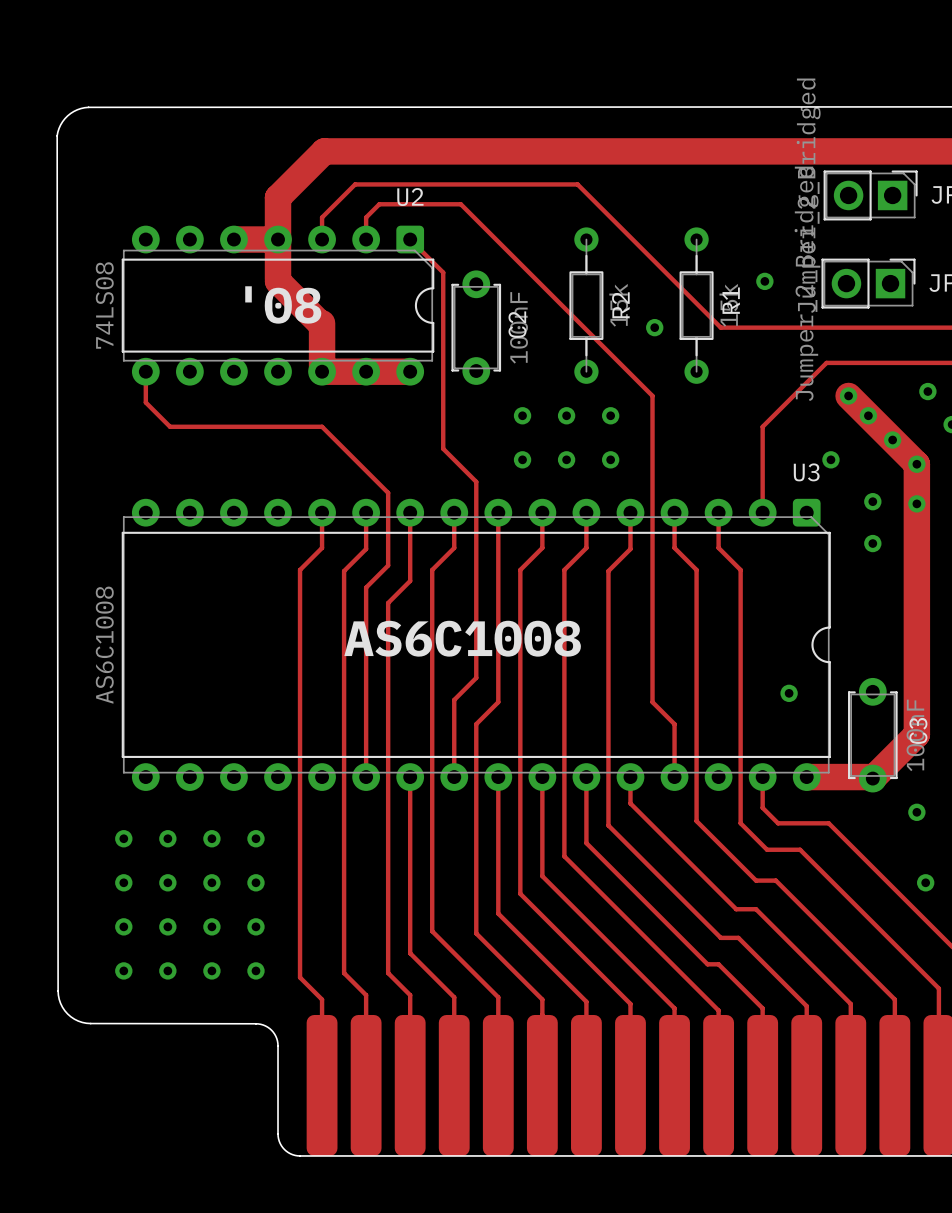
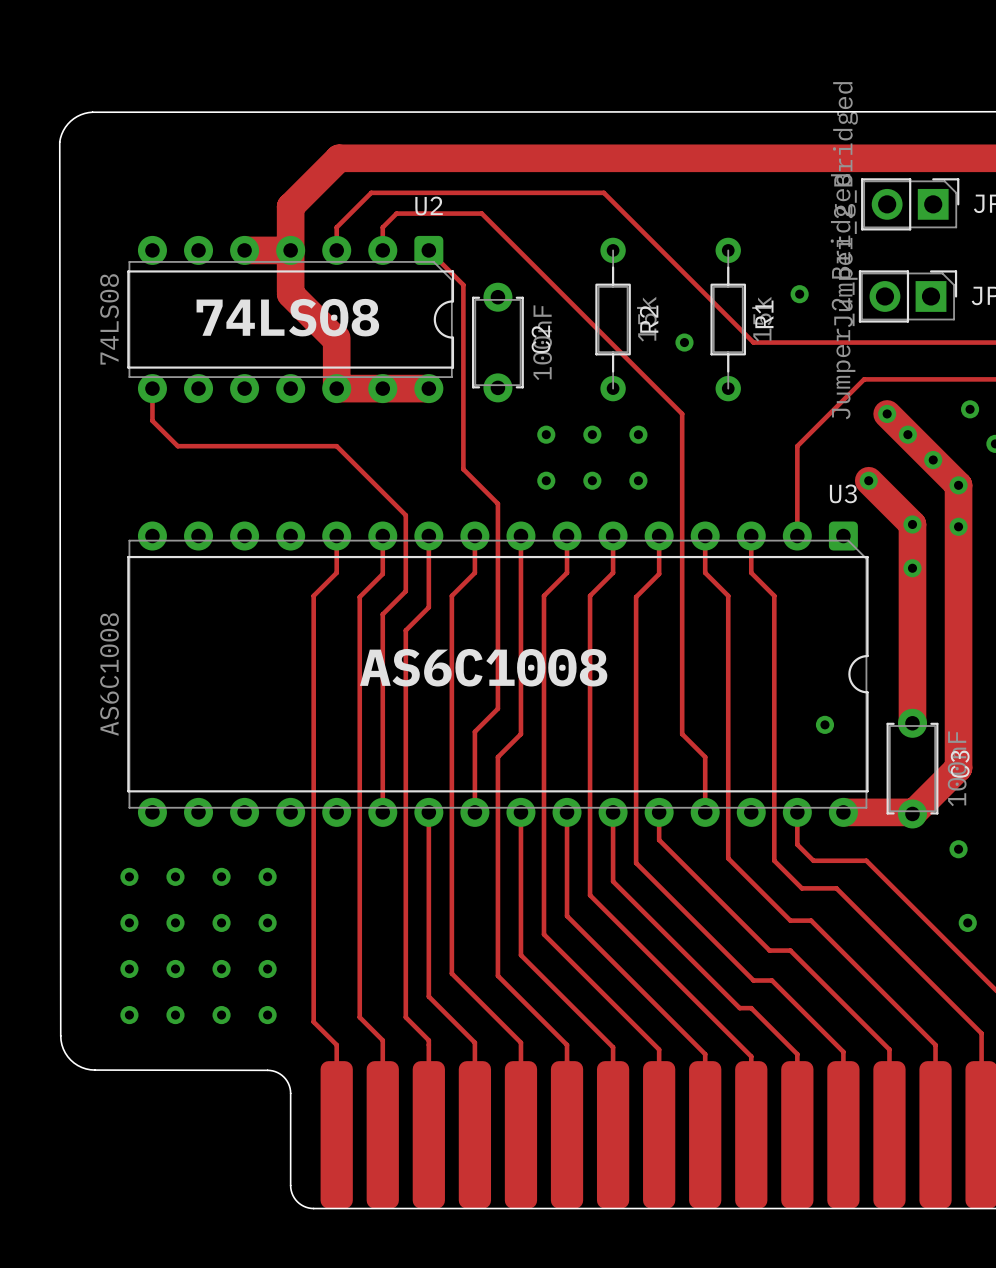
text: none -> 74LS08 (287, 317)
text: '08 (283, 304) -> none
track: none -> (868, 480) (912, 524) (912, 723)

